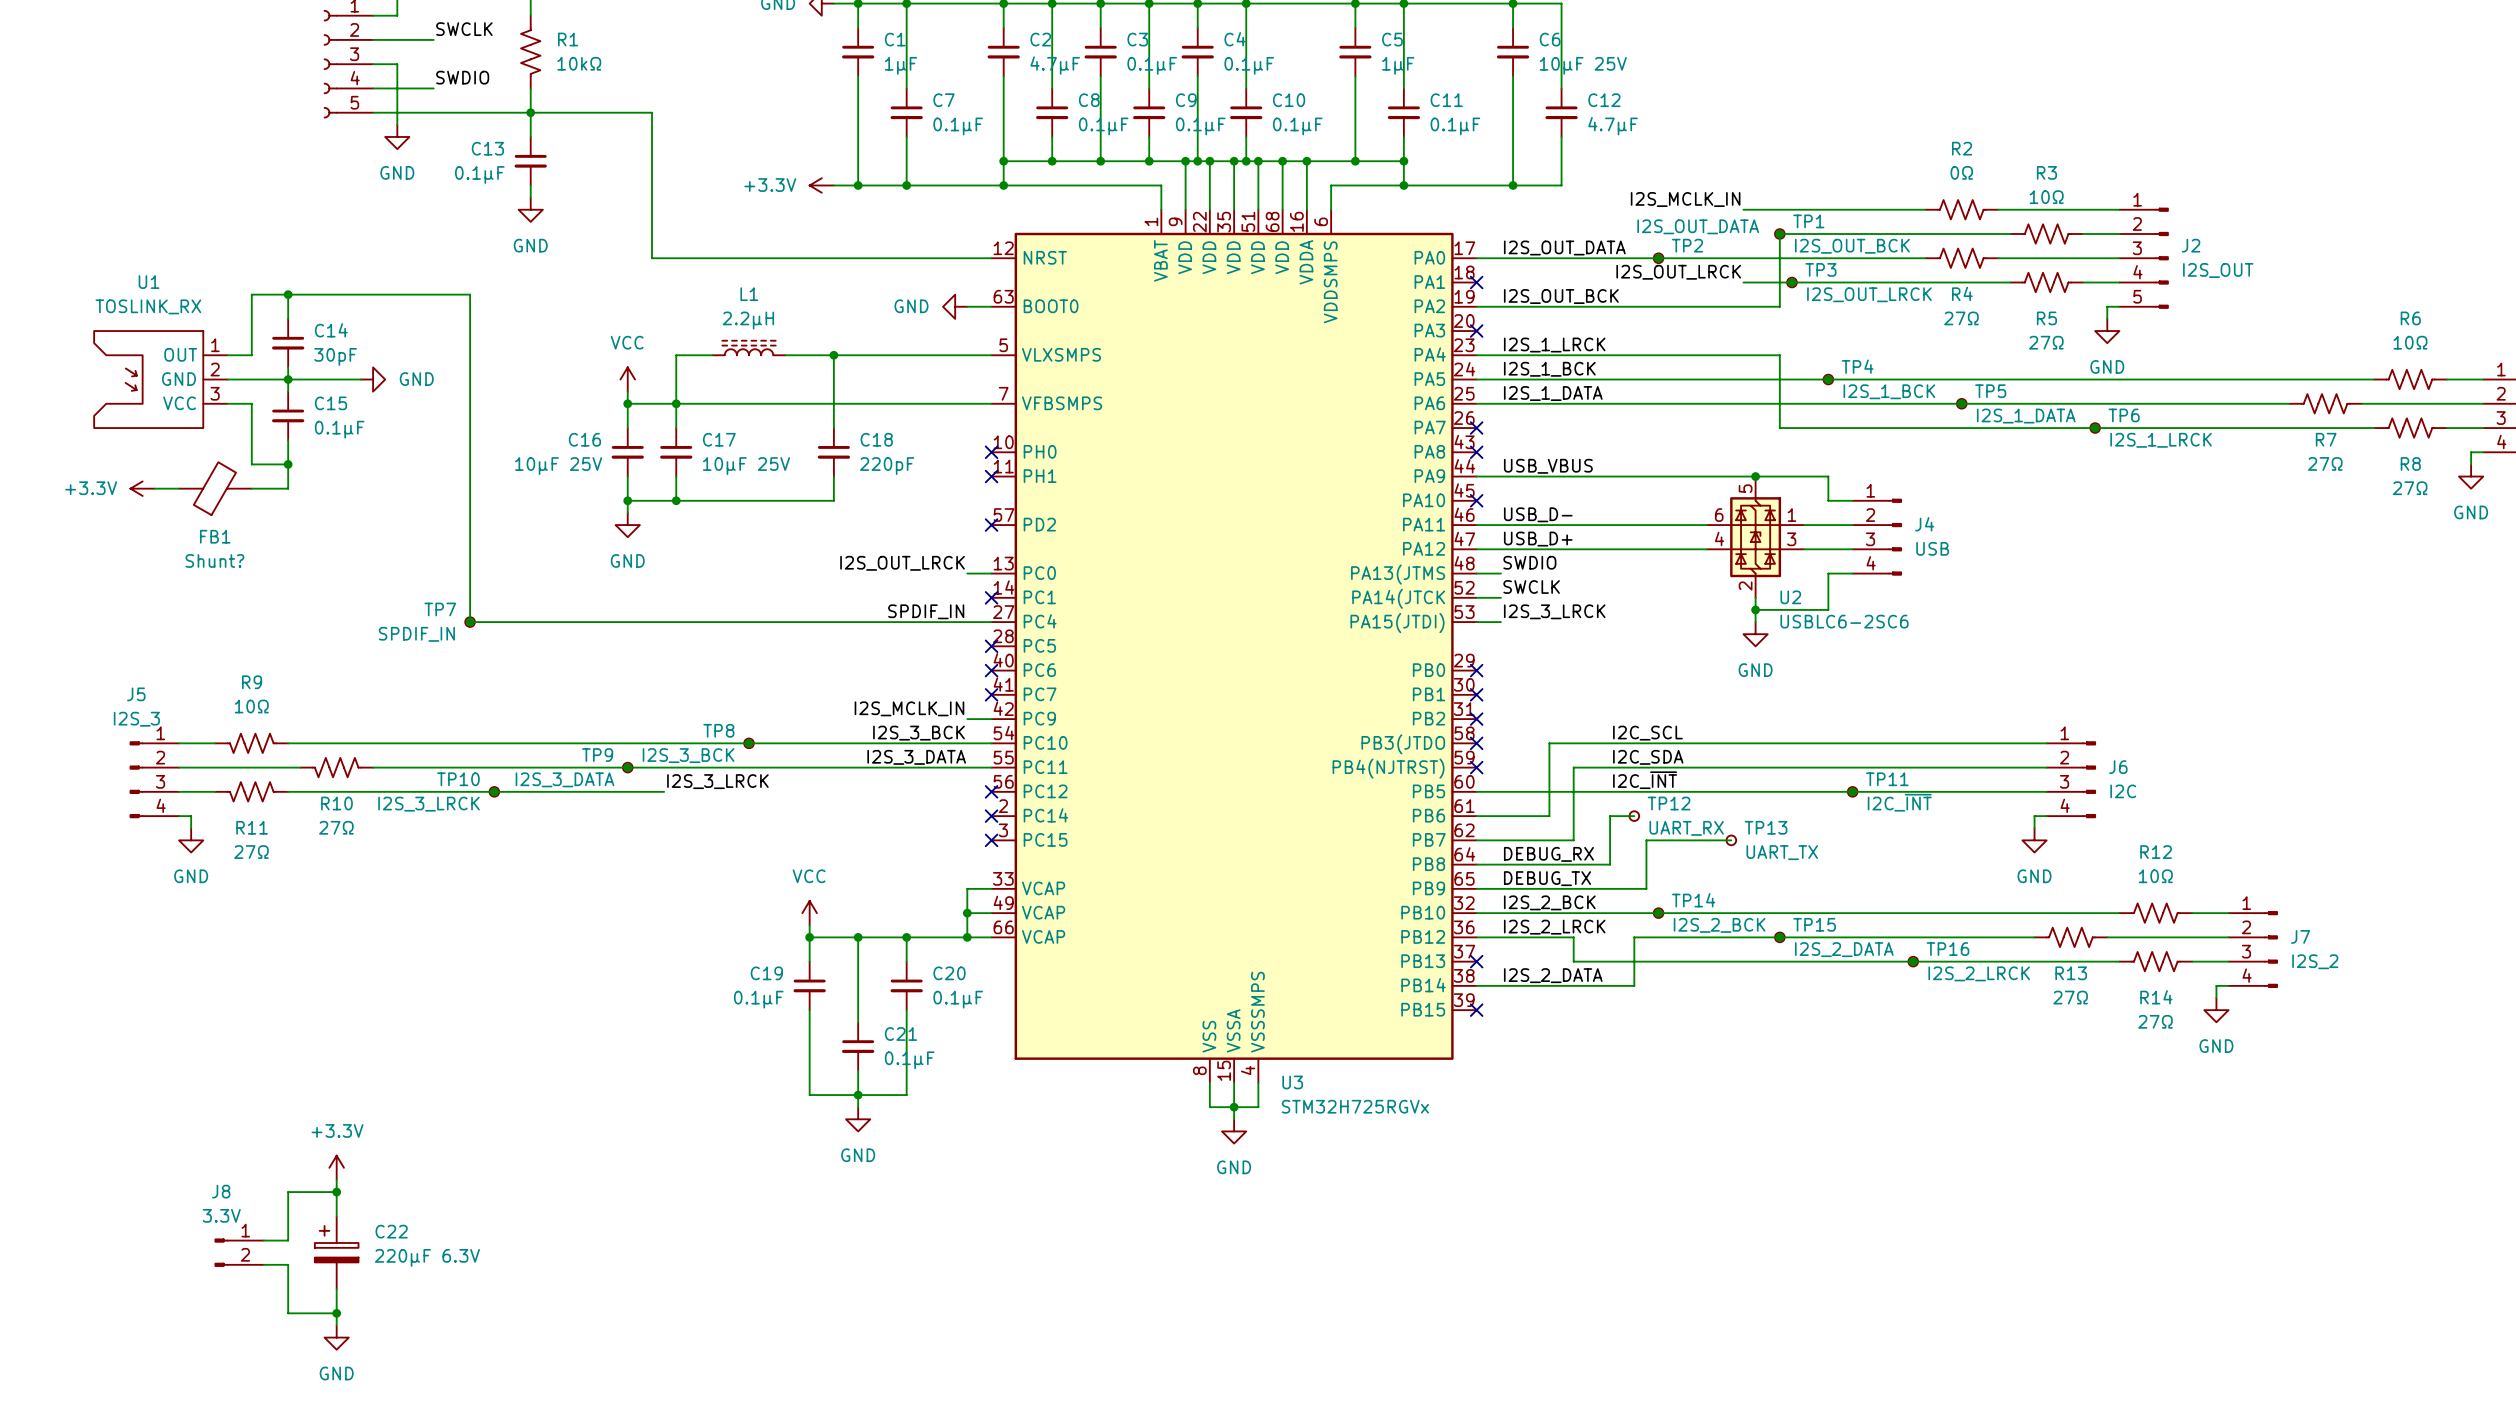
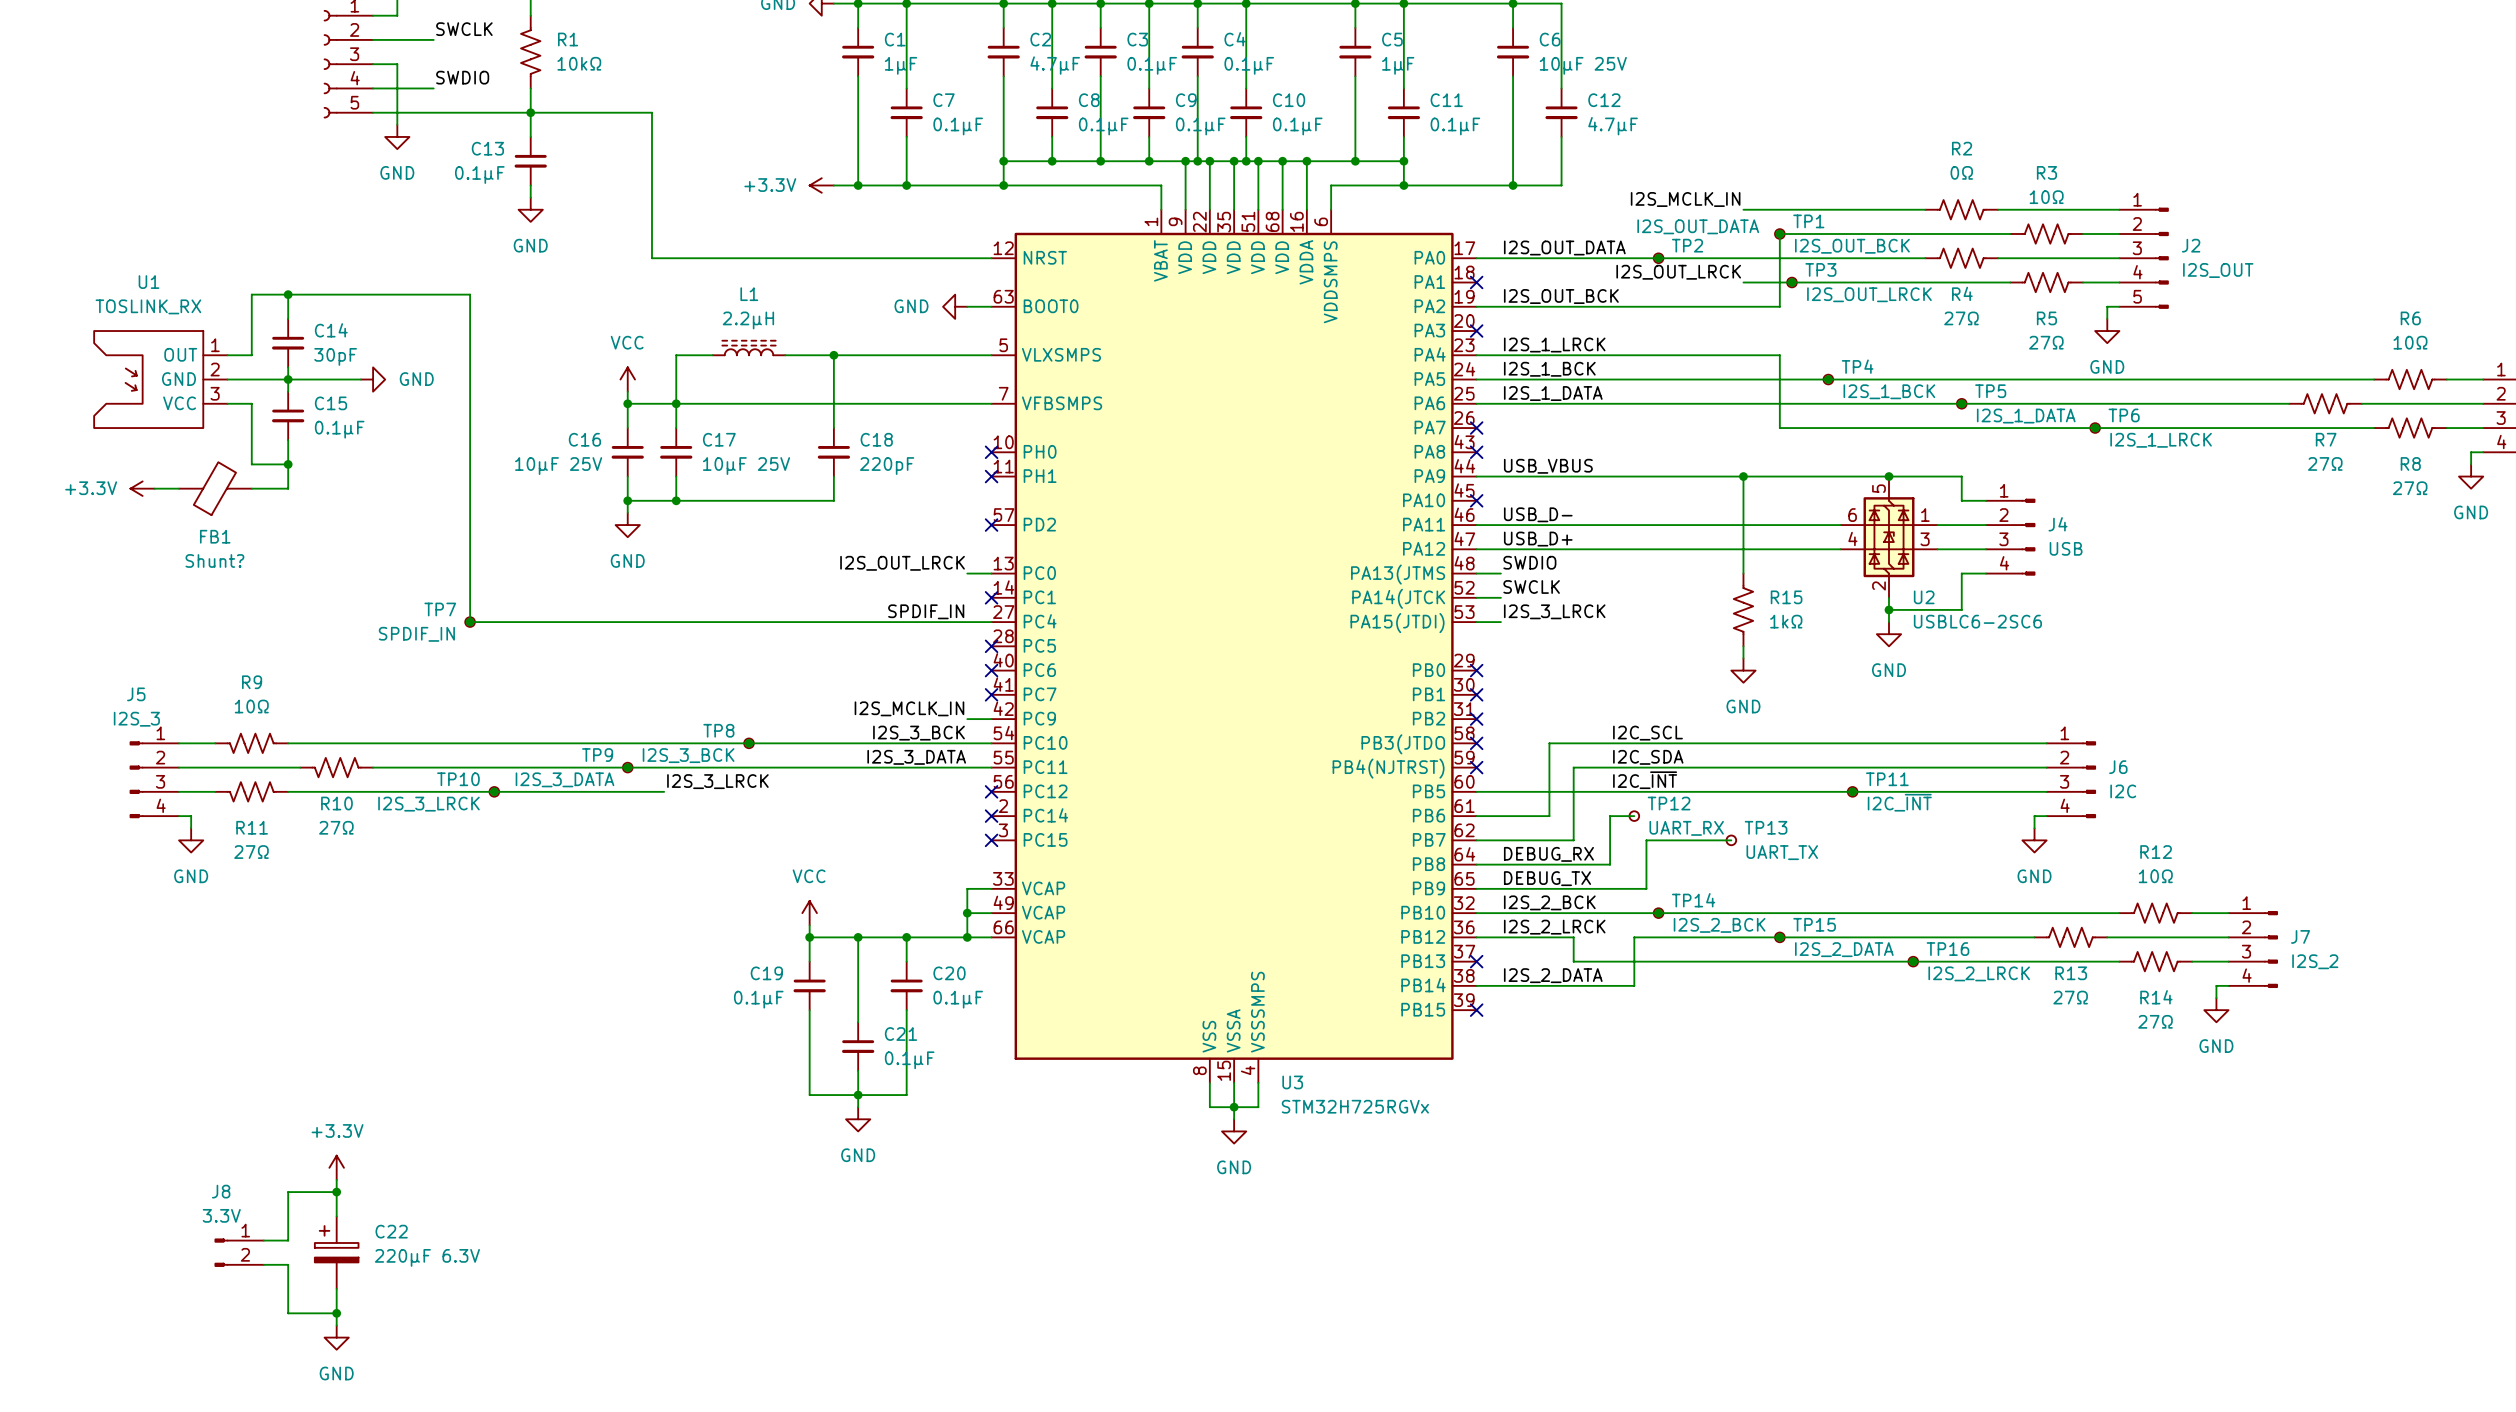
junction position: (1755, 476) -> (1743, 476)
wire: (1828, 476) (1828, 500) (1852, 500) -> (1828, 476) (1961, 476) (1961, 500) (1986, 500)
junction: none -> (1888, 476)
wire: none -> (1937, 525) (1986, 525)
U2 position: (1755, 537) -> (1888, 537)
J4 position: (1877, 537) -> (2010, 537)
wire: none -> (1937, 549) (1986, 549)
wire: (1852, 573) (1828, 573) (1828, 609) (1755, 609) -> (1986, 573) (1961, 573) (1961, 609) (1888, 609)
wire: (1755, 597) (1755, 622) -> (1888, 597) (1888, 622)
R15: none -> 1kΩ (1743, 609)
junction: (1755, 609) -> none
junction: none -> (1888, 609)
power symbol position: GND (1755, 634) -> GND (1743, 670)
power symbol: none -> GND (1888, 634)
wire: none -> (1743, 646) (1743, 658)

